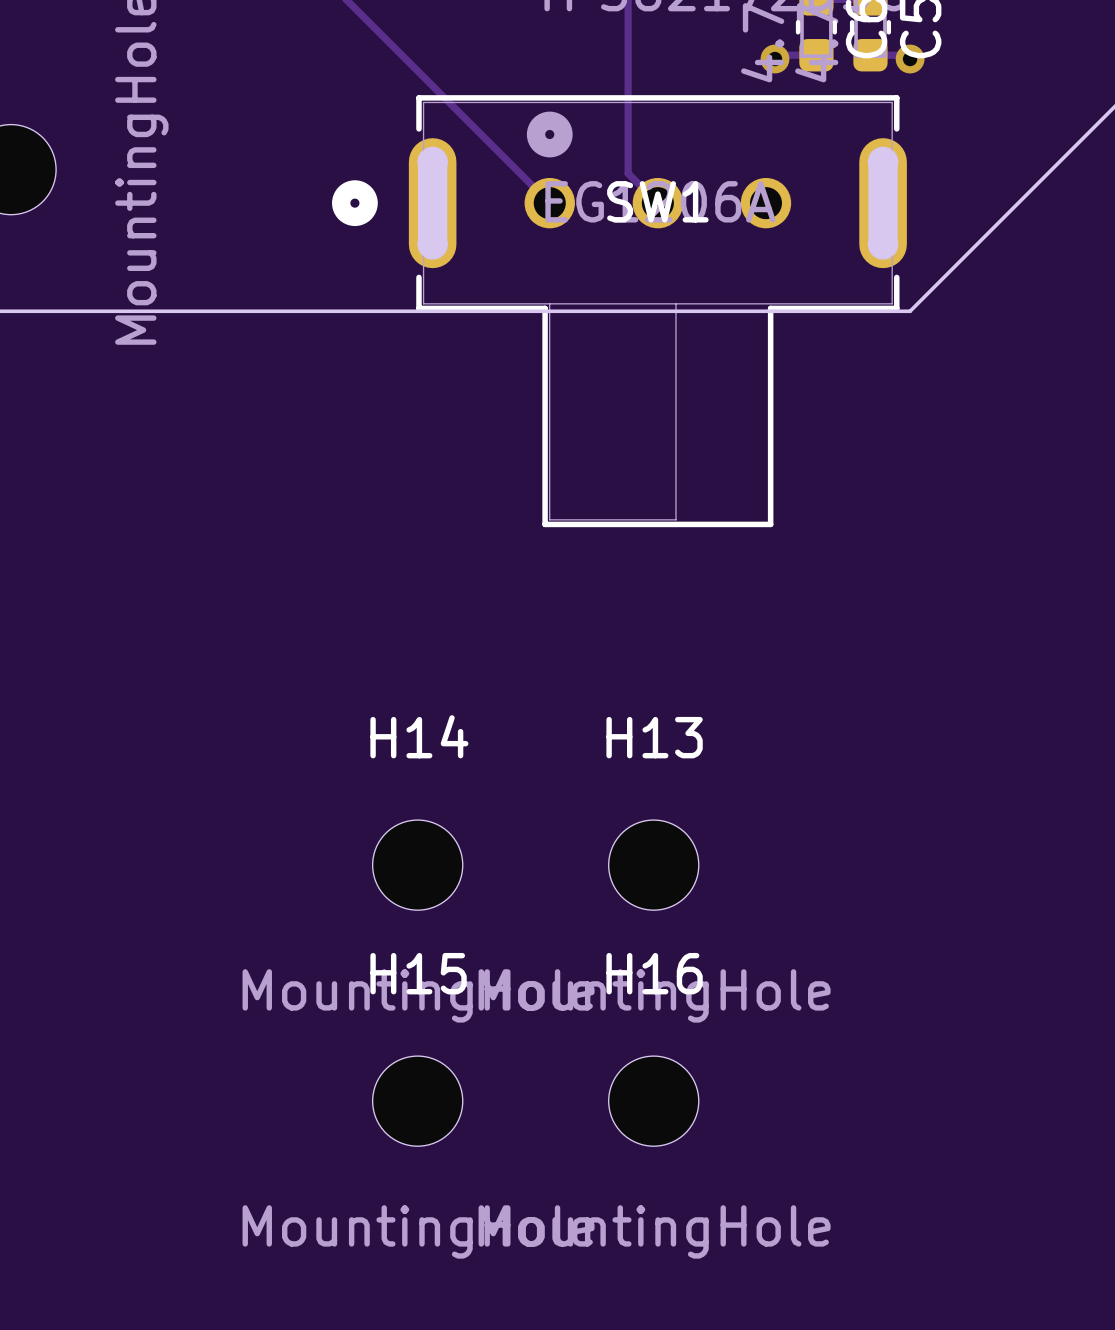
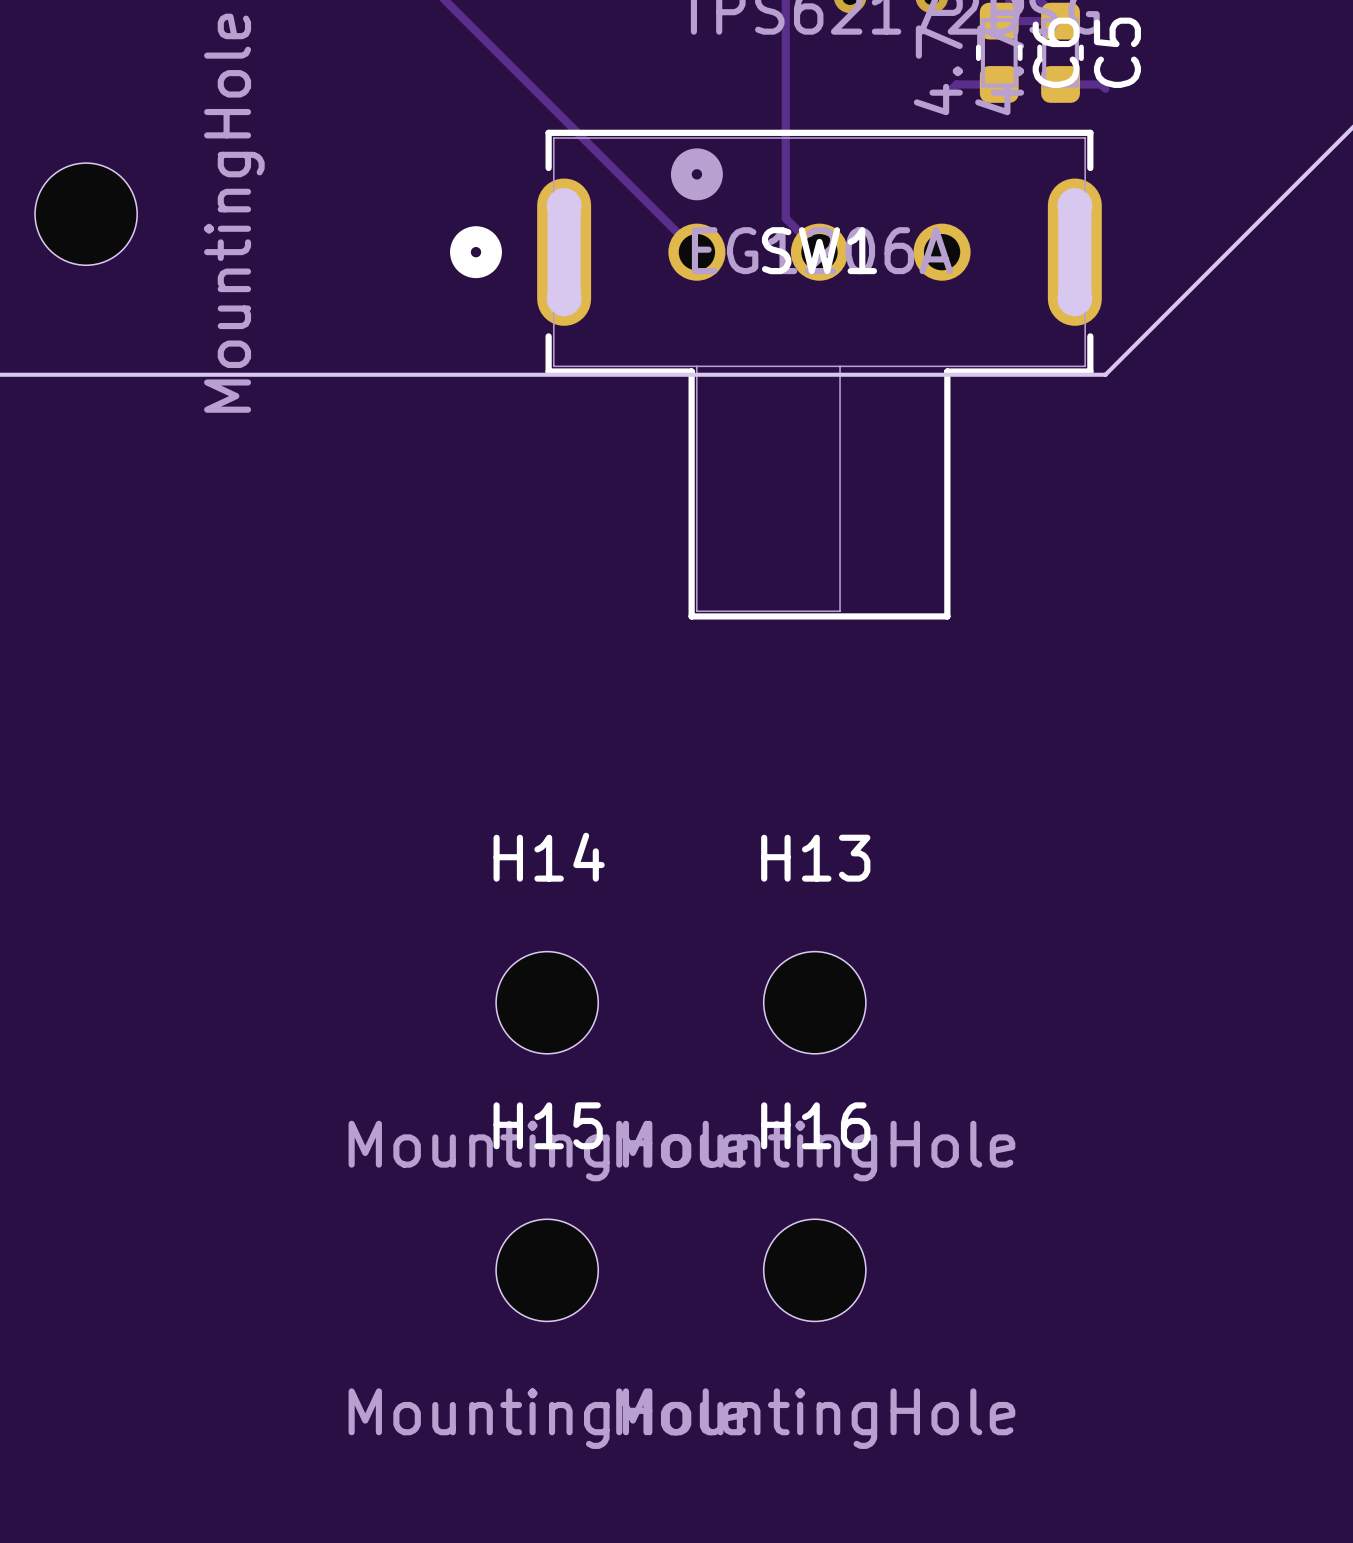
via: (774, 59) -> none
via: (910, 59) -> none

